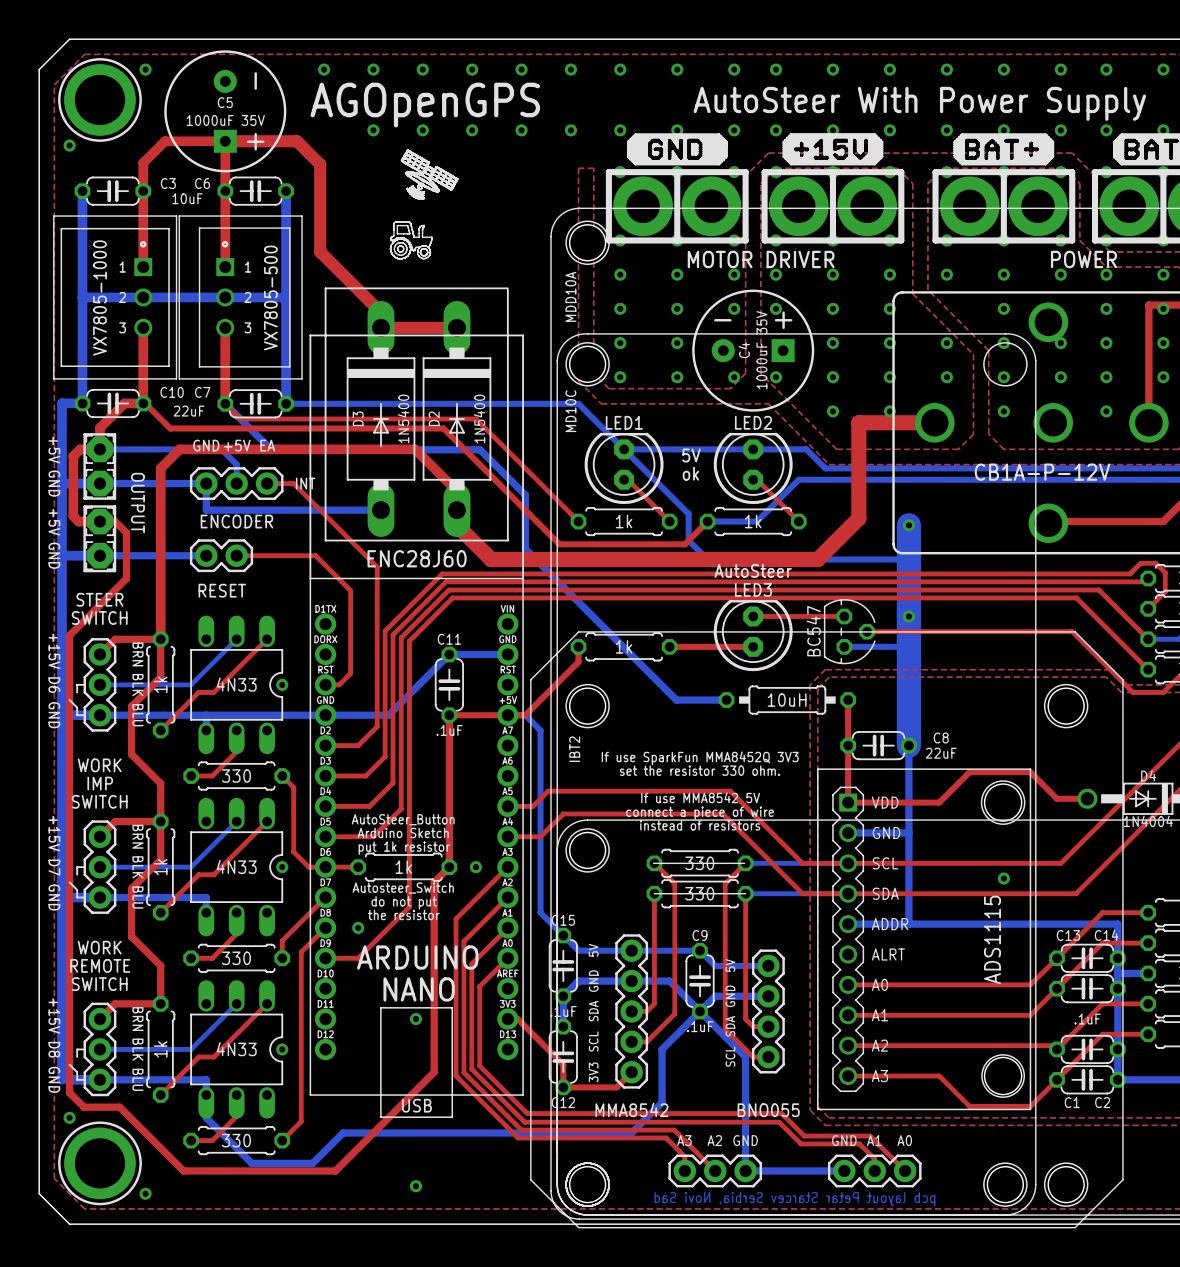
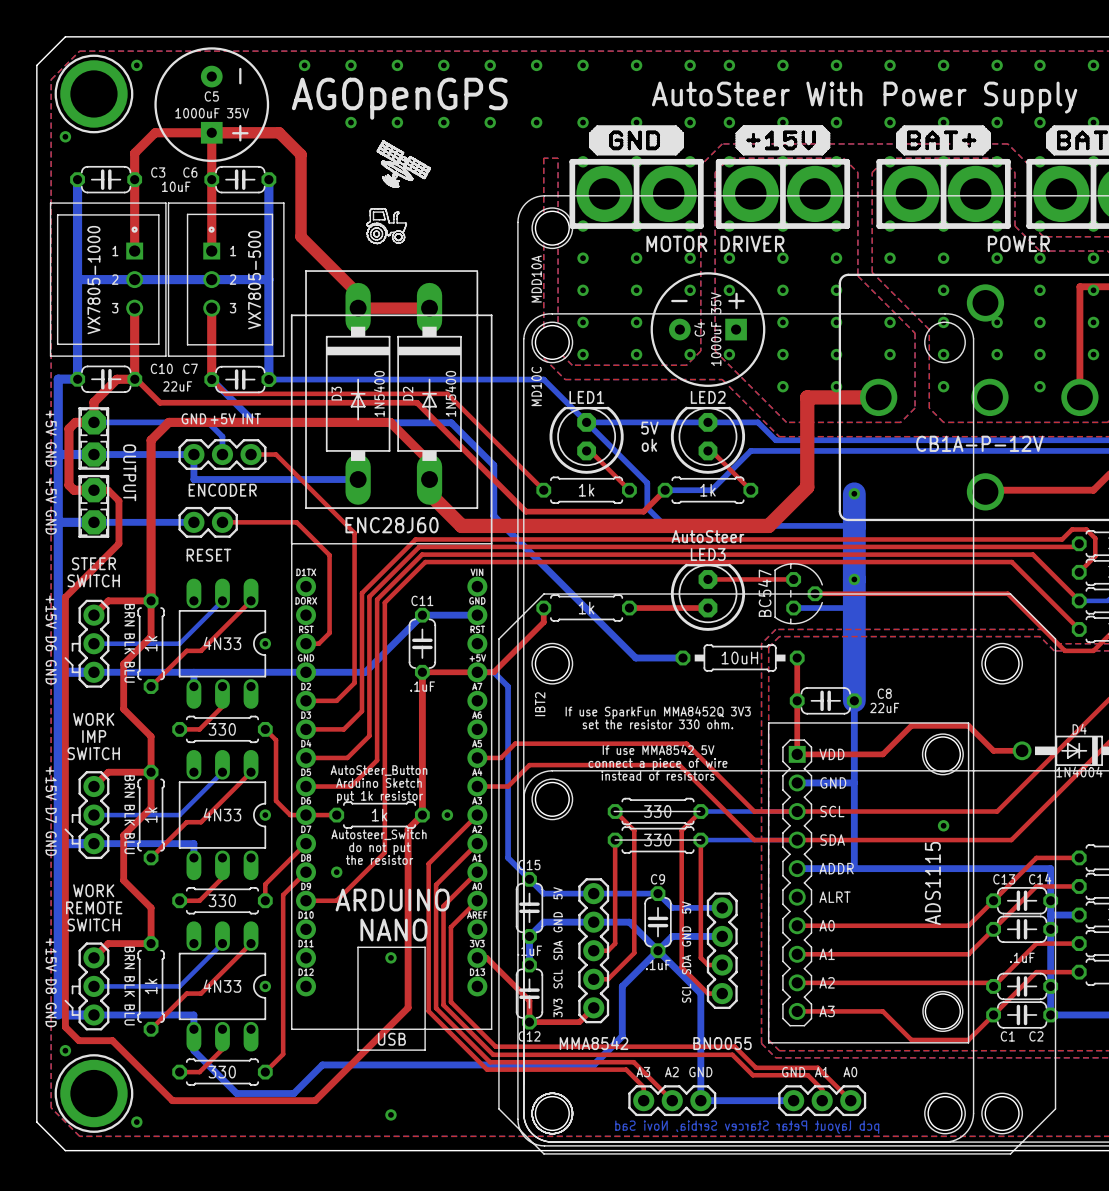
text: EA (267, 445) -> none
INT name position: INT (305, 483) -> INT (251, 418)

